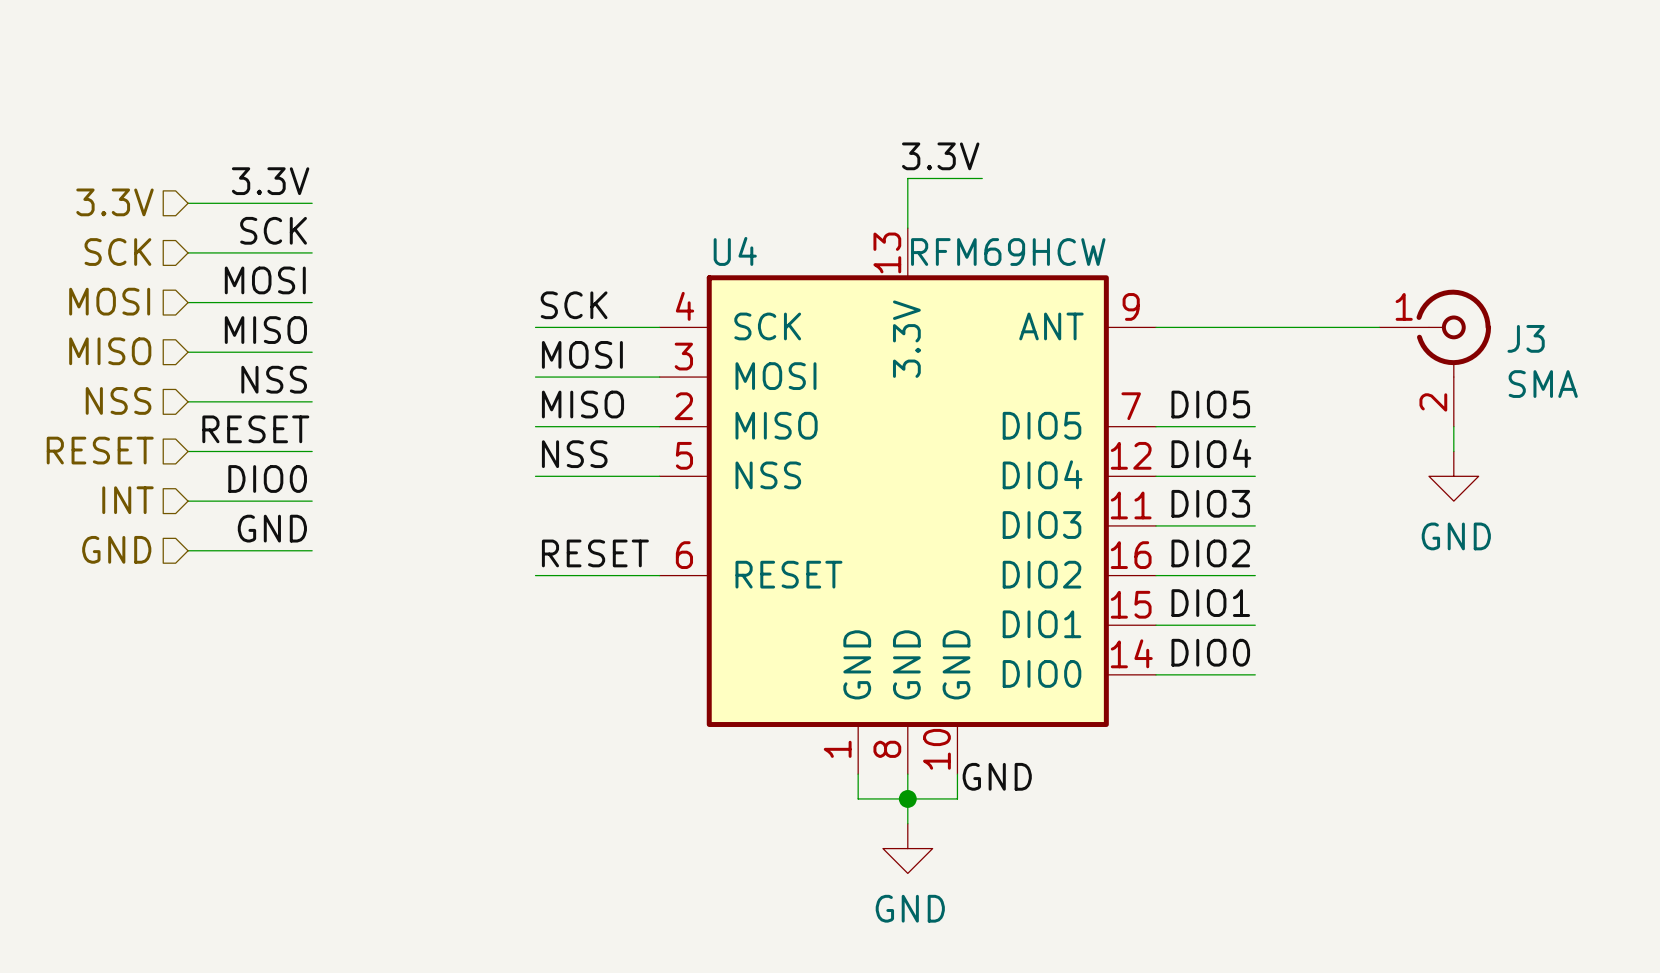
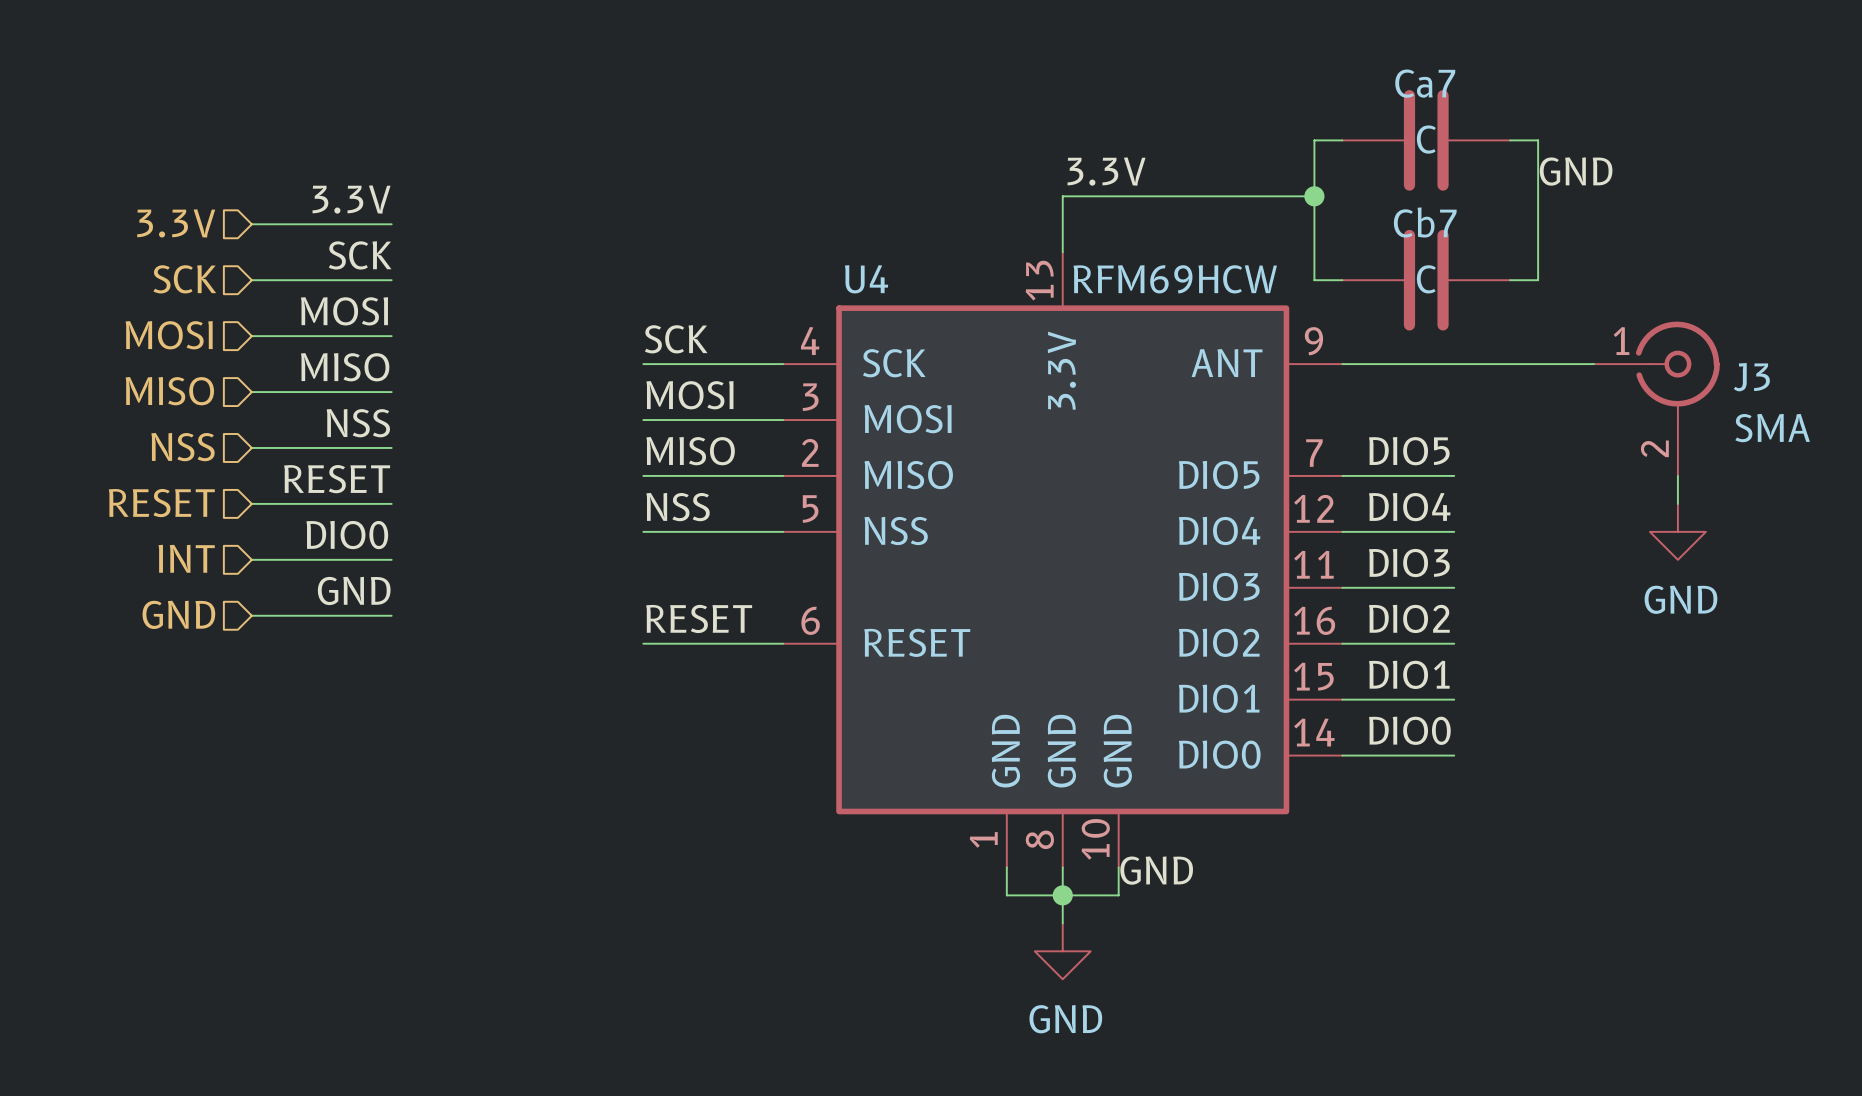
wire: none -> (1342, 140) (1314, 140) (1314, 280) (1342, 280)
Ca7: none -> C (1426, 140)
wire: none -> (1510, 140) (1538, 140) (1538, 280) (1510, 280)
label: none -> GND (1576, 171)
wire: none -> (1146, 196) (1314, 196)
junction: none -> (1314, 196)
Cb7: none -> C (1426, 280)

